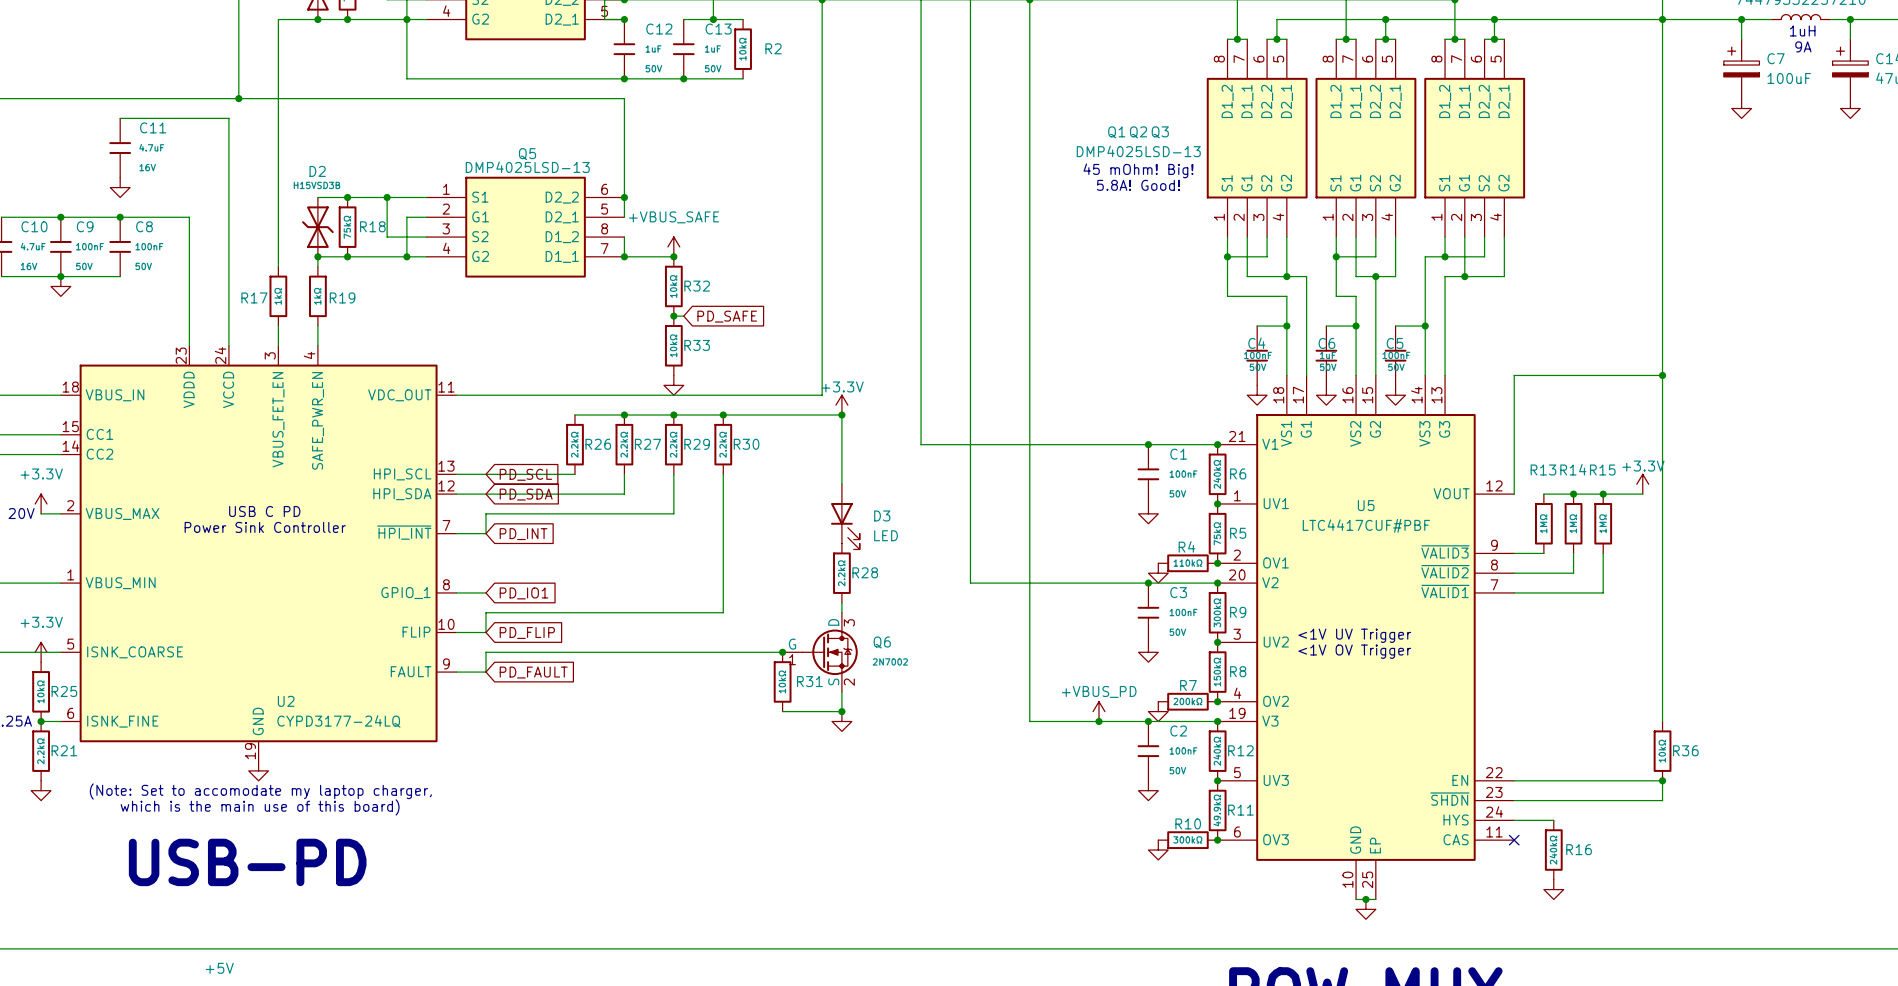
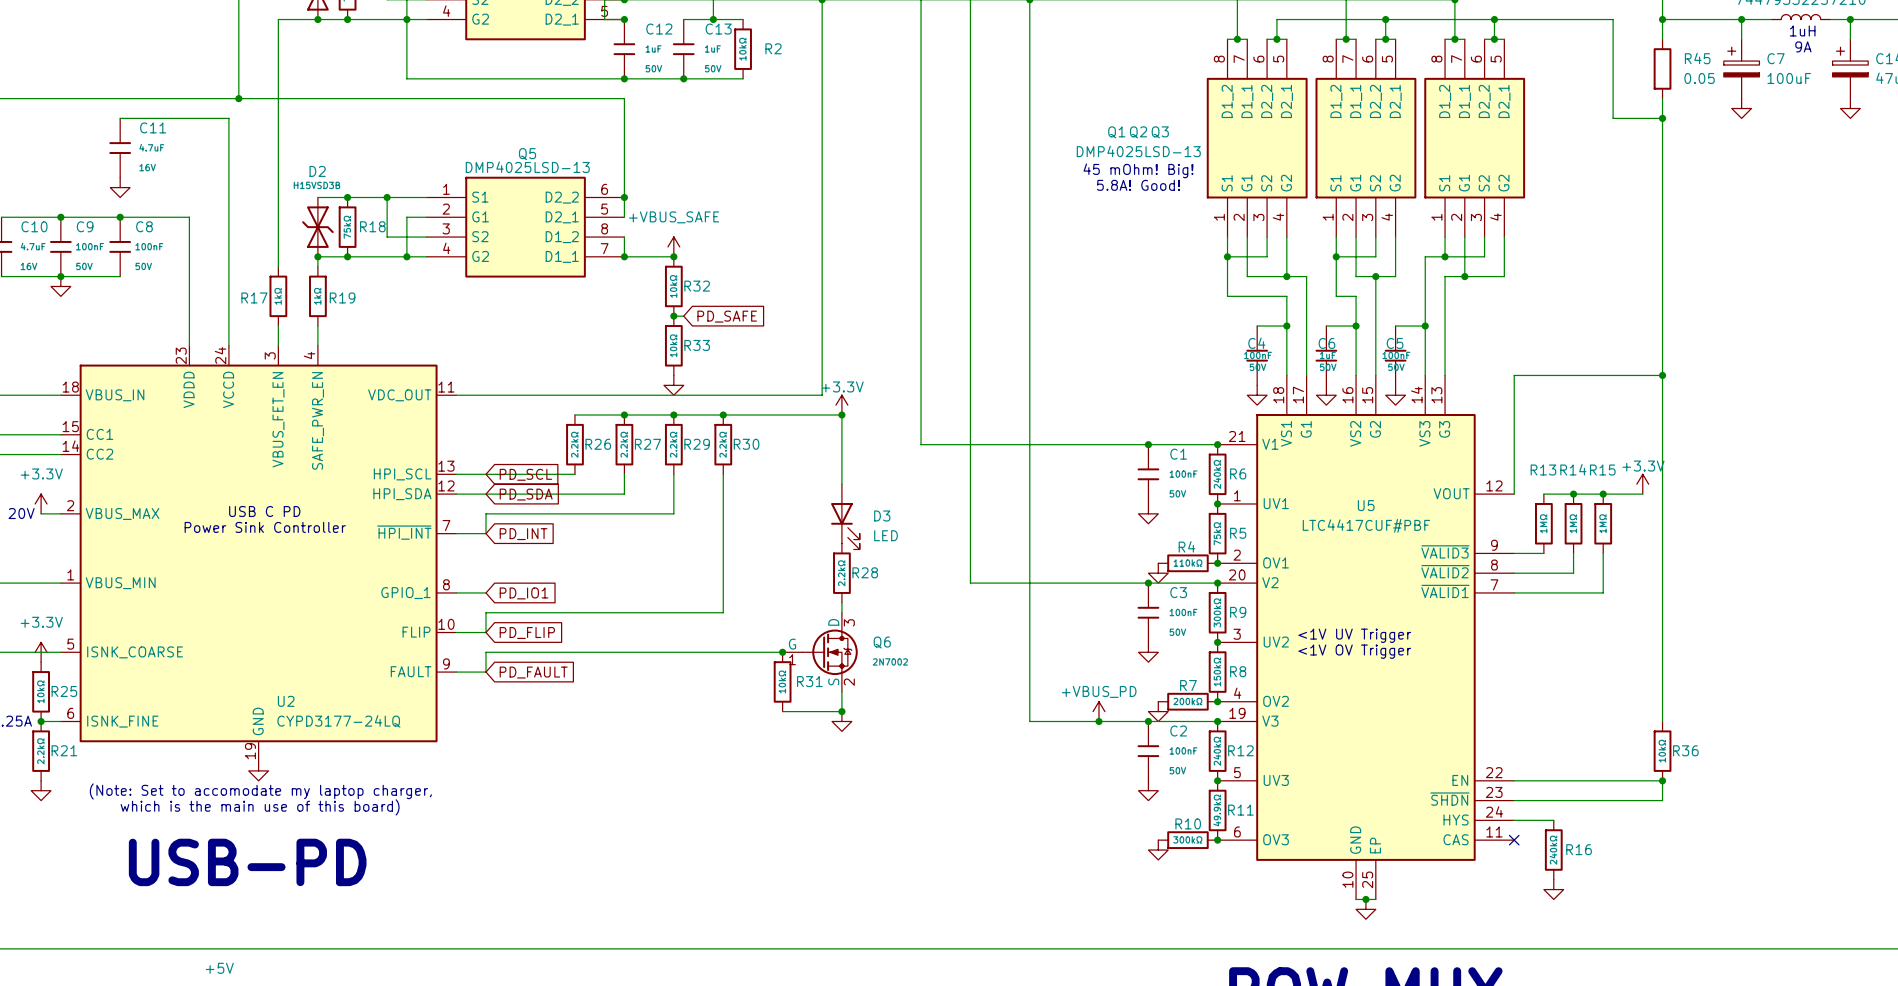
wire: (1613, 19) (1662, 19) -> (1613, 19) (1613, 118) (1662, 118)
wire: (1662, 39) (1662, 98) -> none
R45: none -> 0.05 (1662, 68)
junction: none -> (1662, 118)

